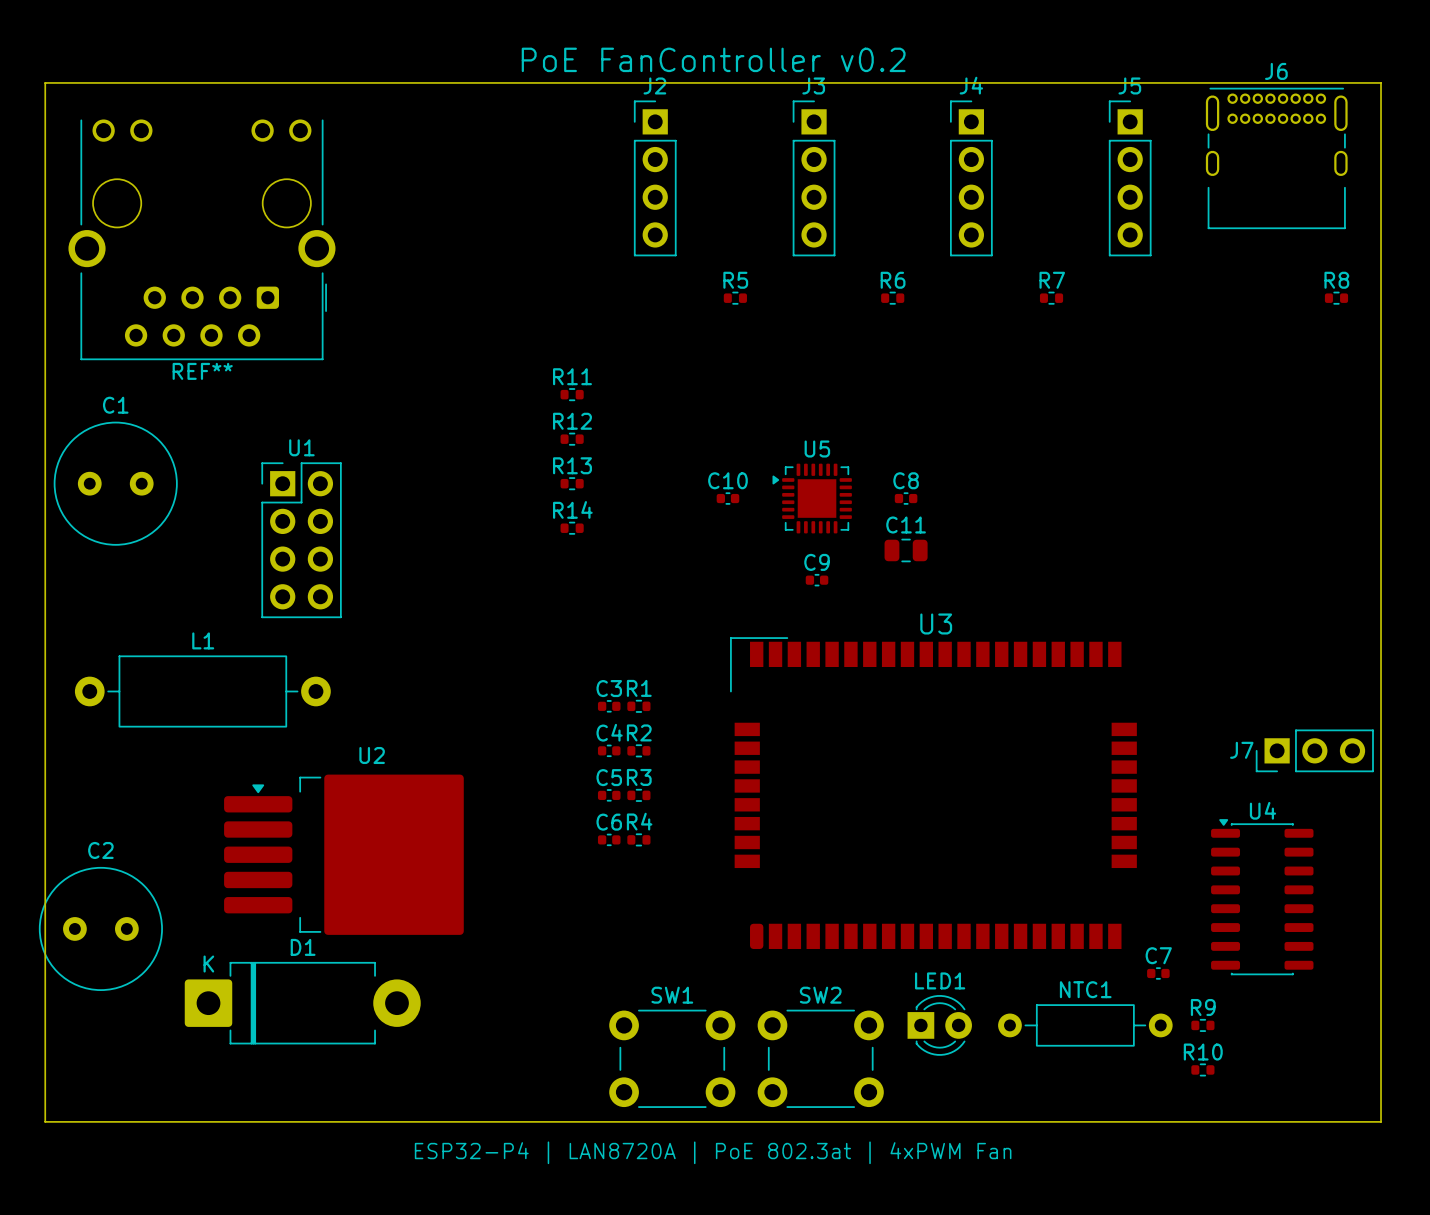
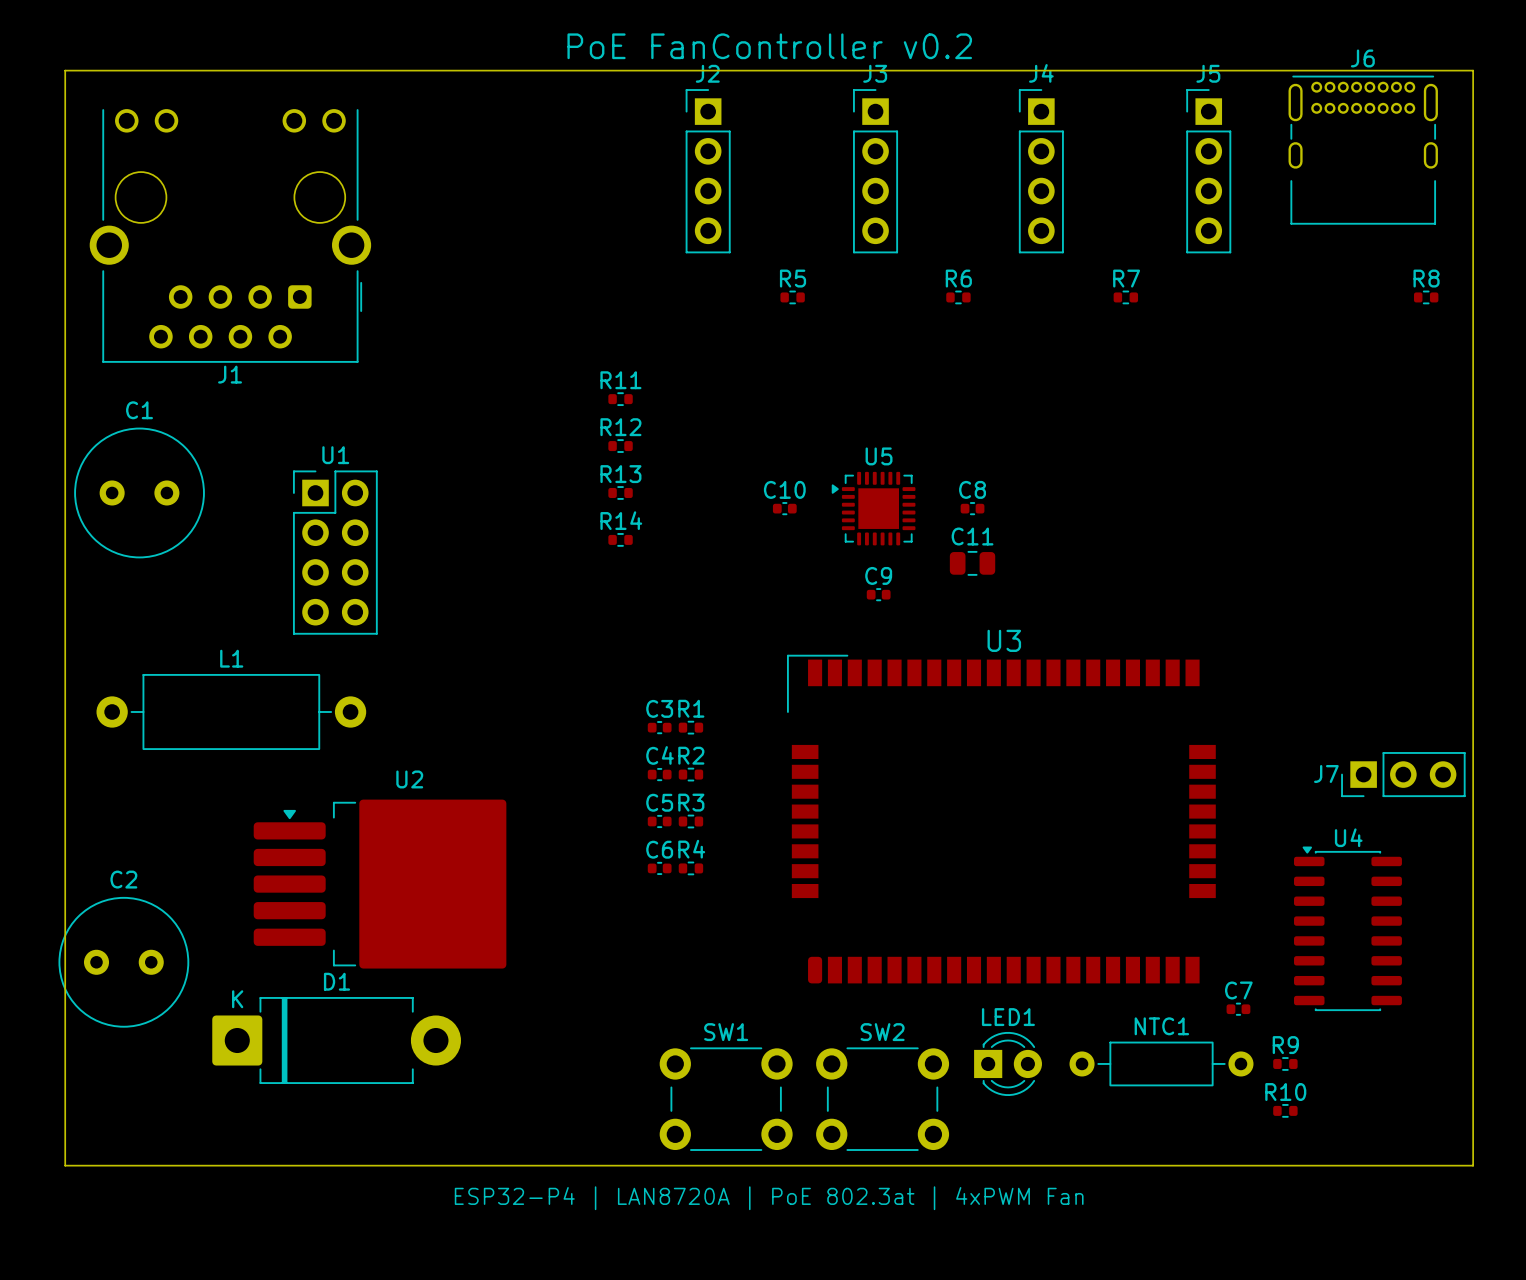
REF** name: REF** (202, 371) -> J1 (230, 374)

